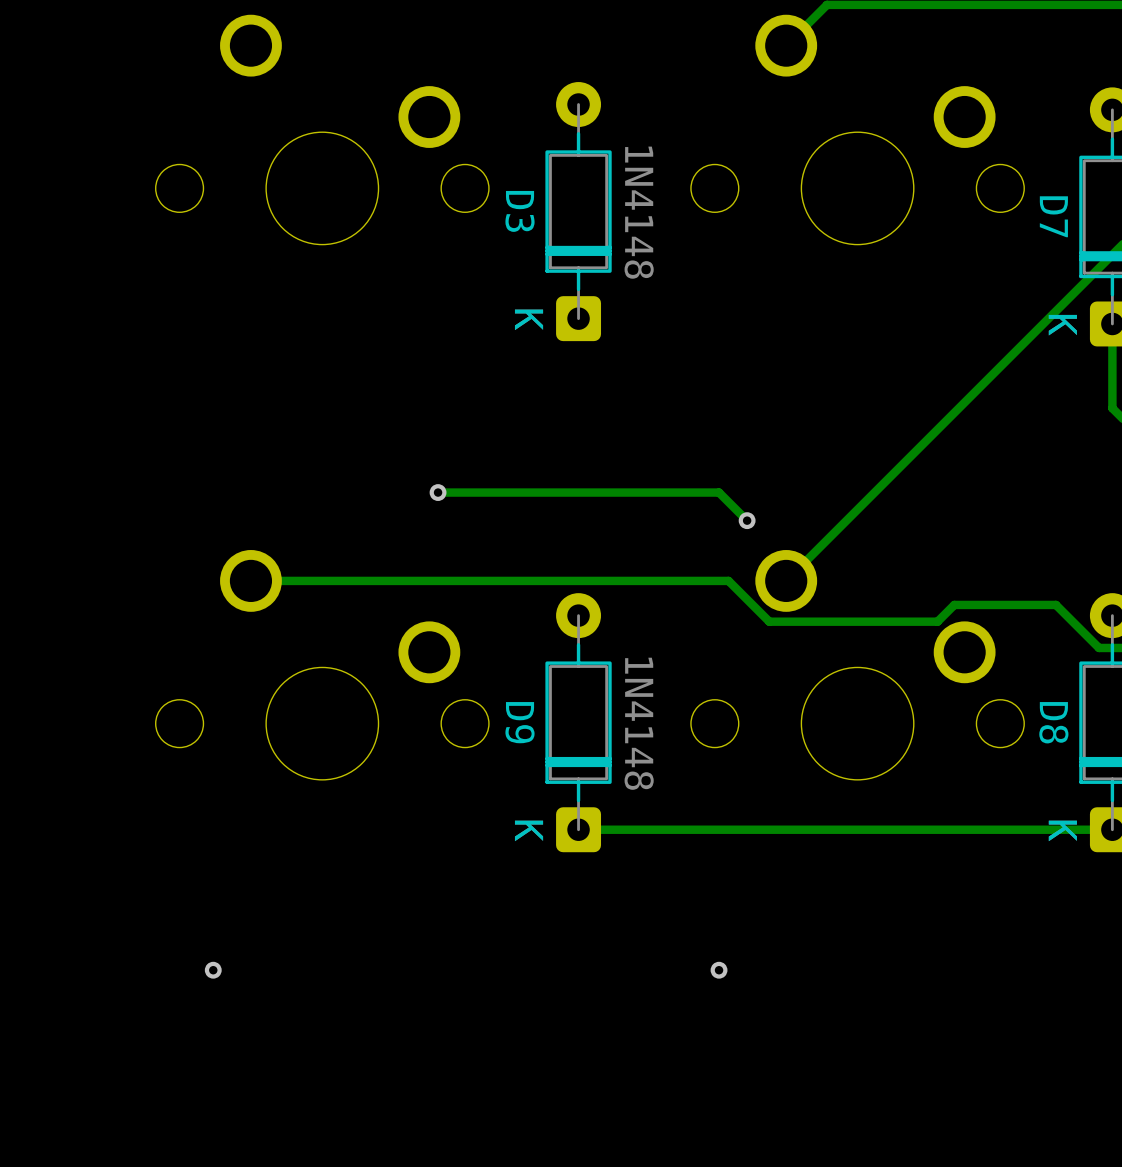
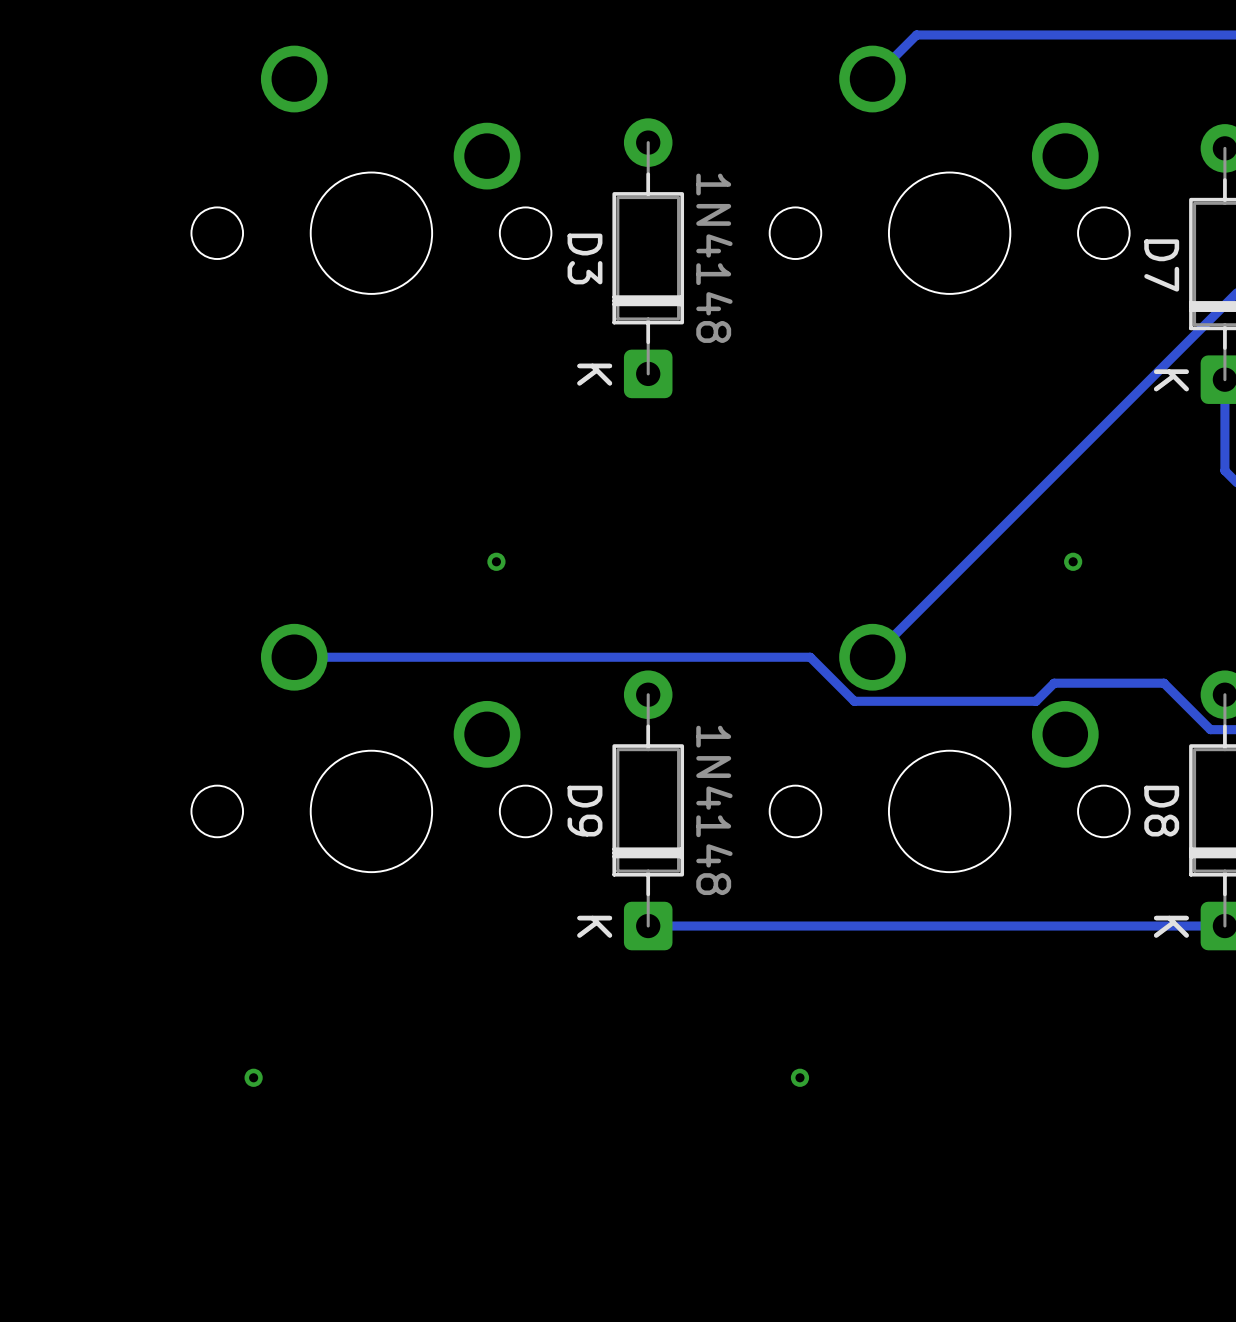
track: (438, 492) (719, 492) (747, 520) -> none
via: none -> (1073, 561)
via: (747, 520) -> none

